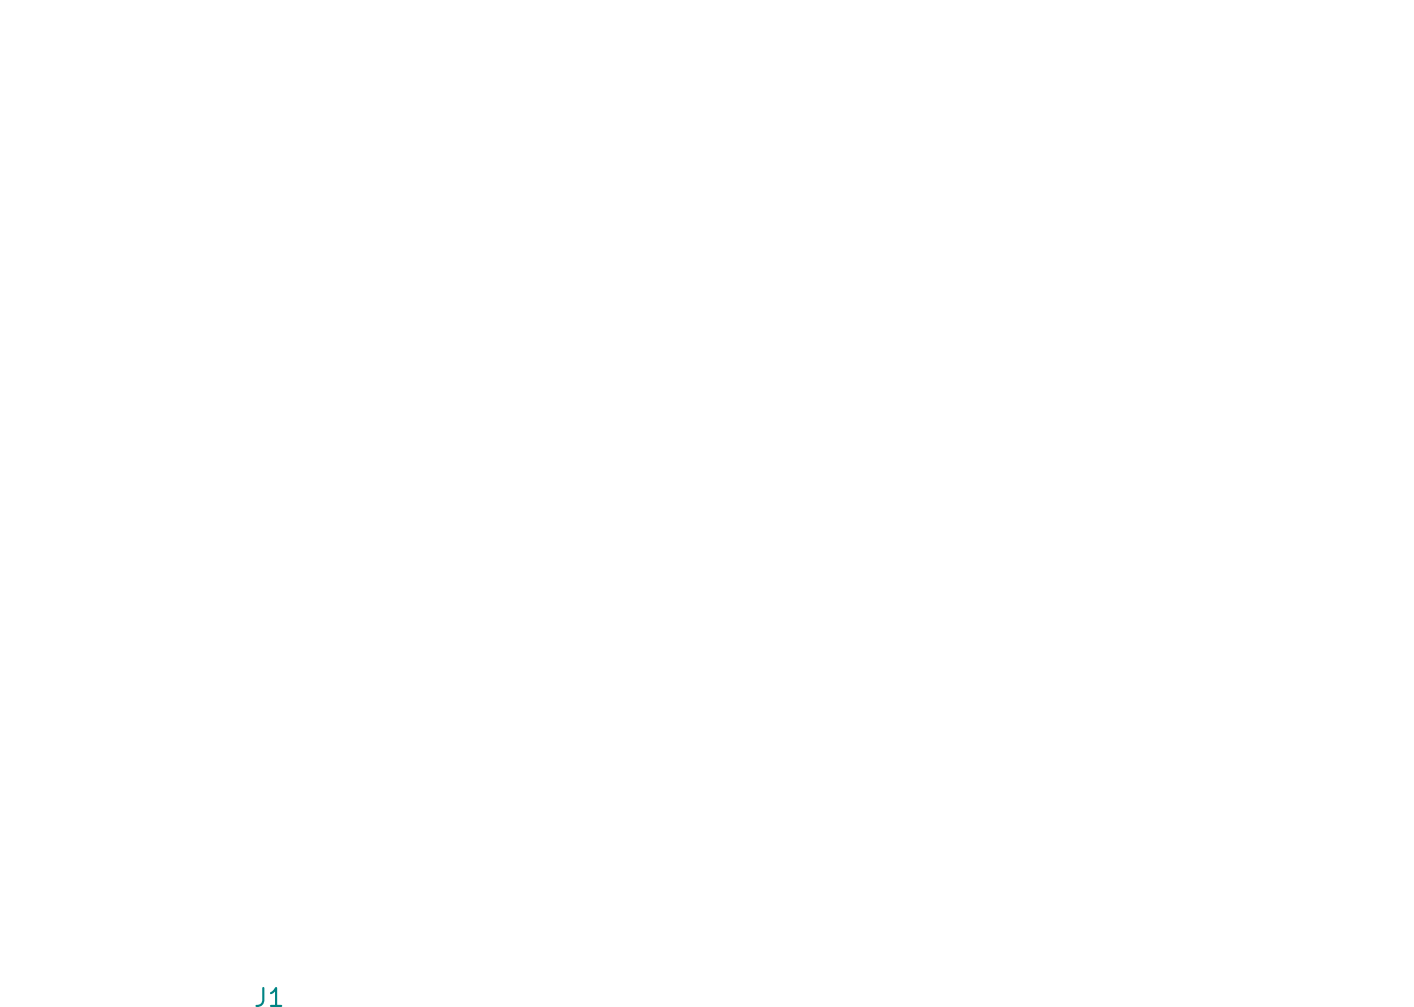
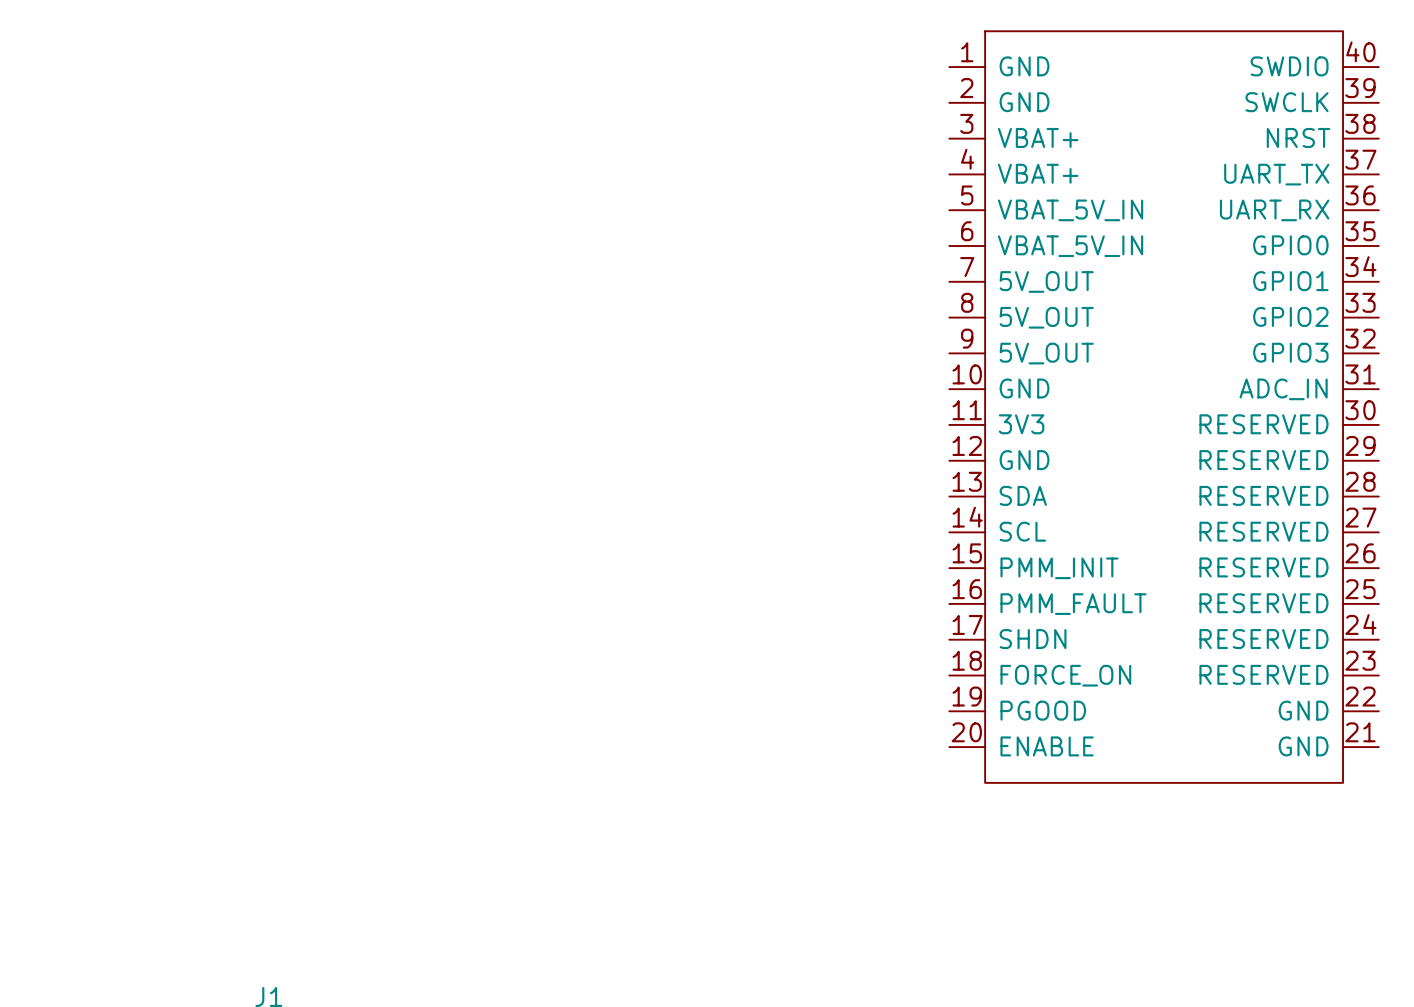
part: none -> (1164, 407)

